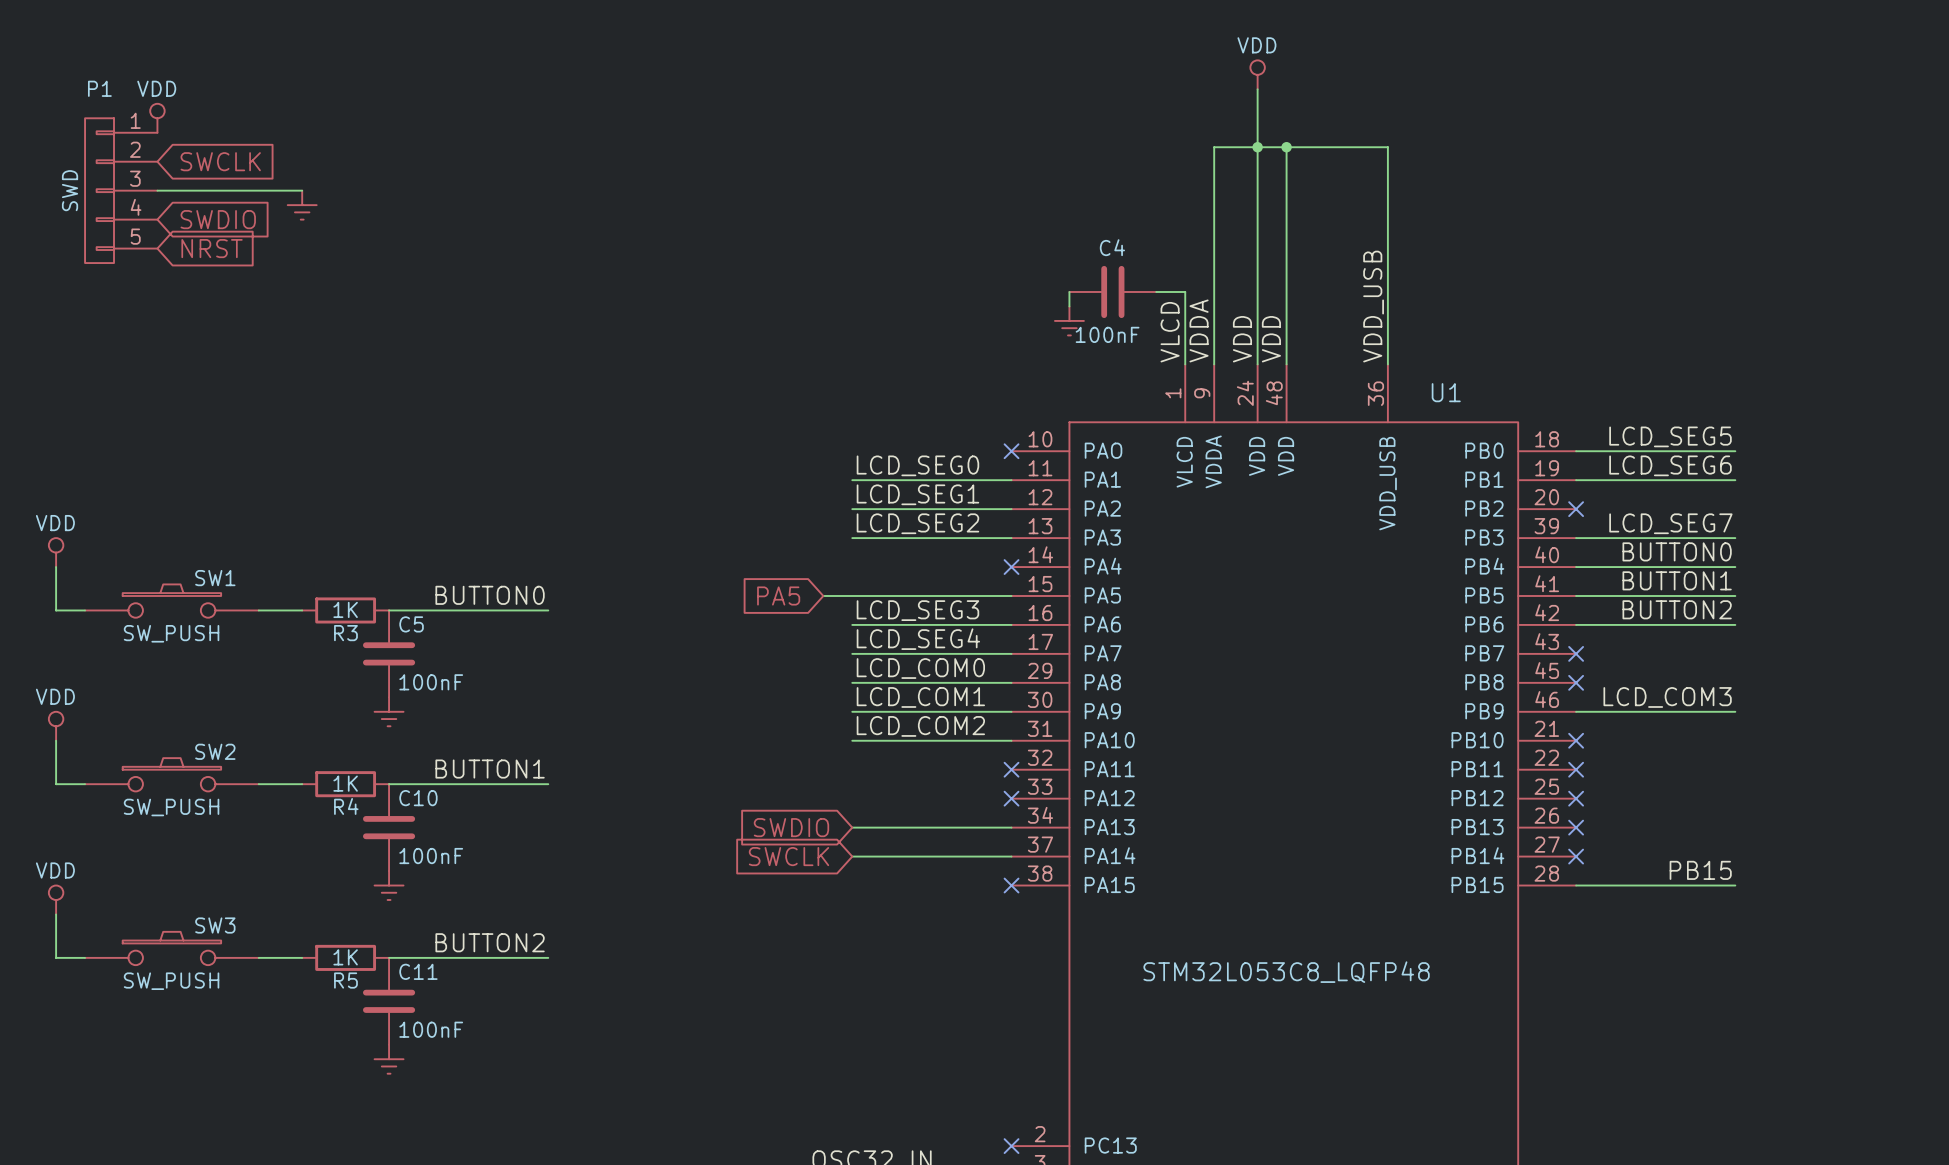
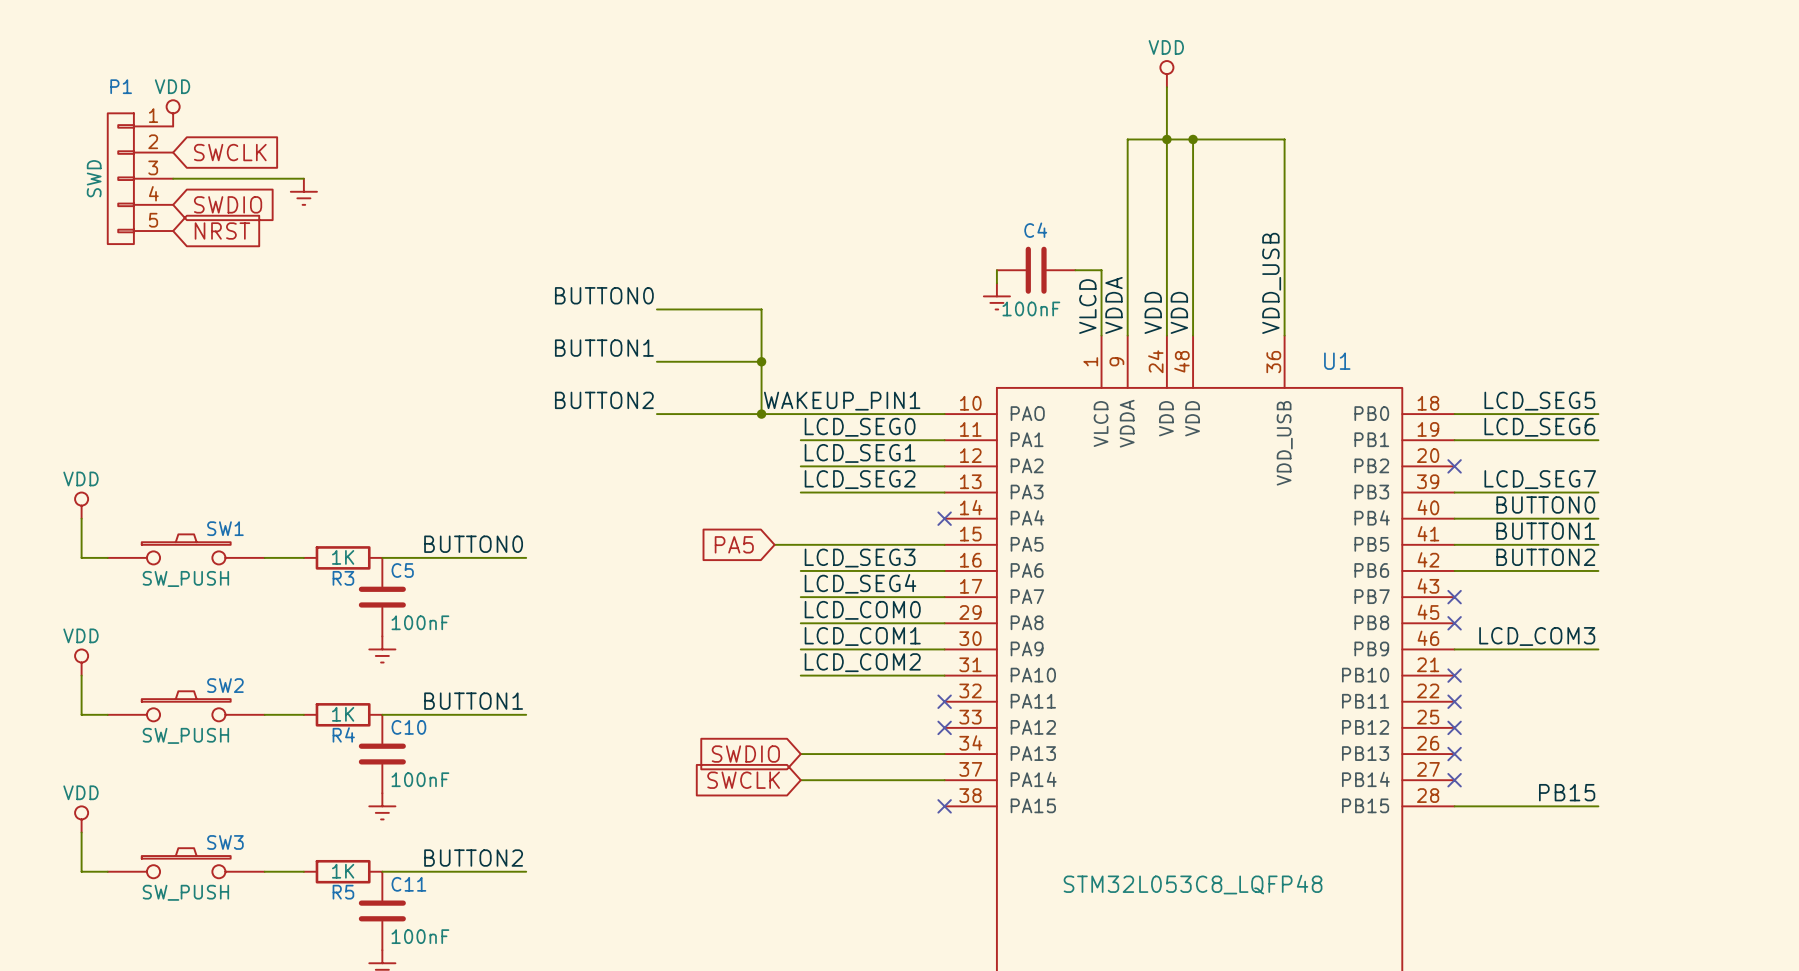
label: none -> BUTTON0 (604, 295)
wire: none -> (656, 309) (761, 309) (761, 414)
label: none -> BUTTON1 (604, 348)
wire: none -> (656, 361) (761, 361)
junction: none -> (761, 361)
label: none -> BUTTON2 (604, 400)
label: none -> WAKEUP_PIN1 (842, 401)
wire: none -> (656, 414) (944, 414)
junction: none -> (761, 414)
no-connect mark: (1011, 451) -> none

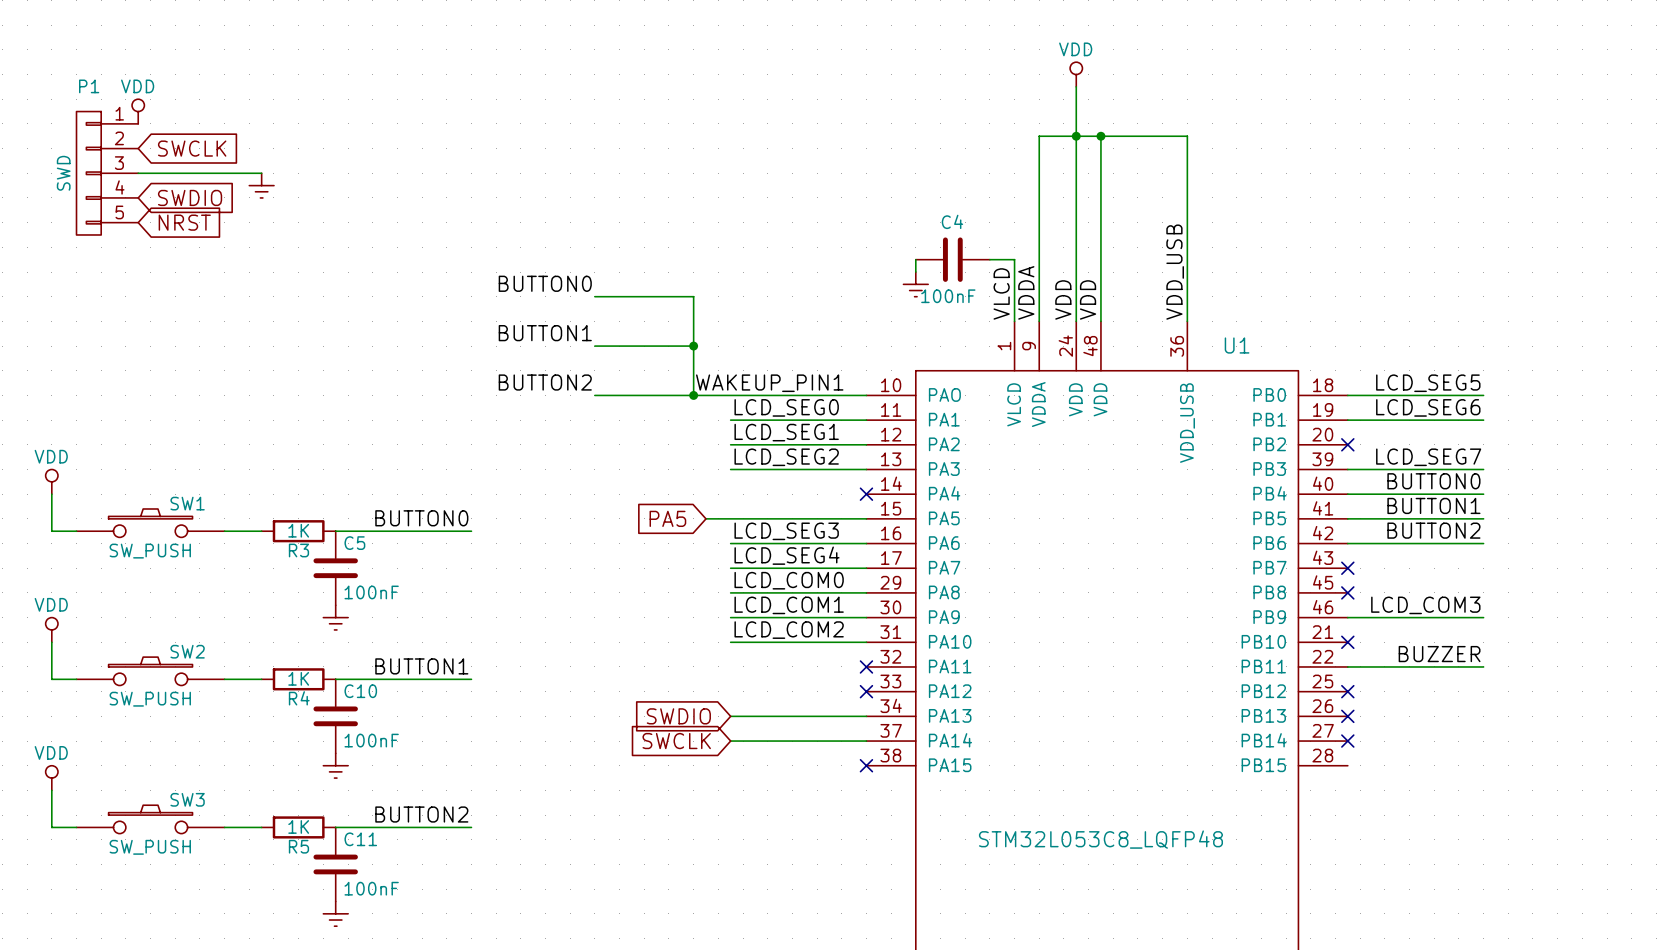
label: none -> BUZZER (1439, 654)
no-connect mark: (1454, 701) -> none
label: PB15 (1567, 792) -> none
wire: (1454, 806) (1598, 806) -> (1347, 666) (1483, 666)

